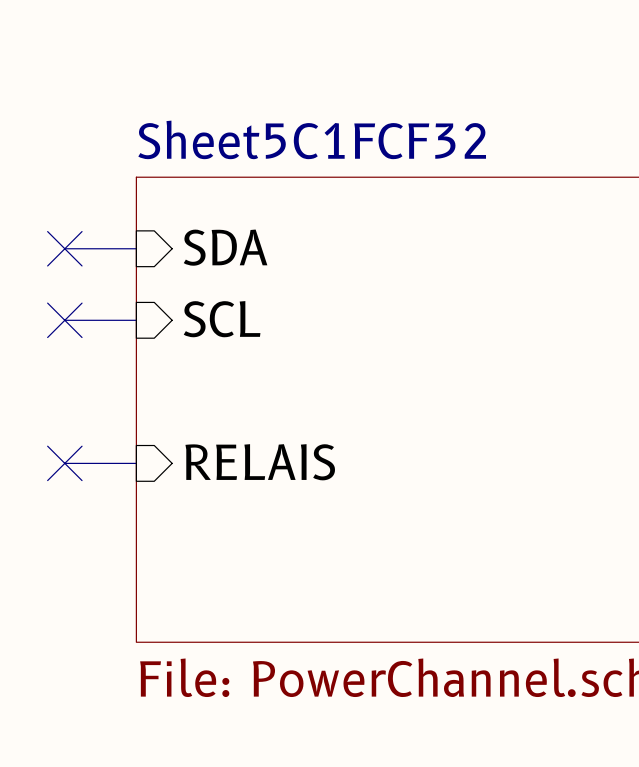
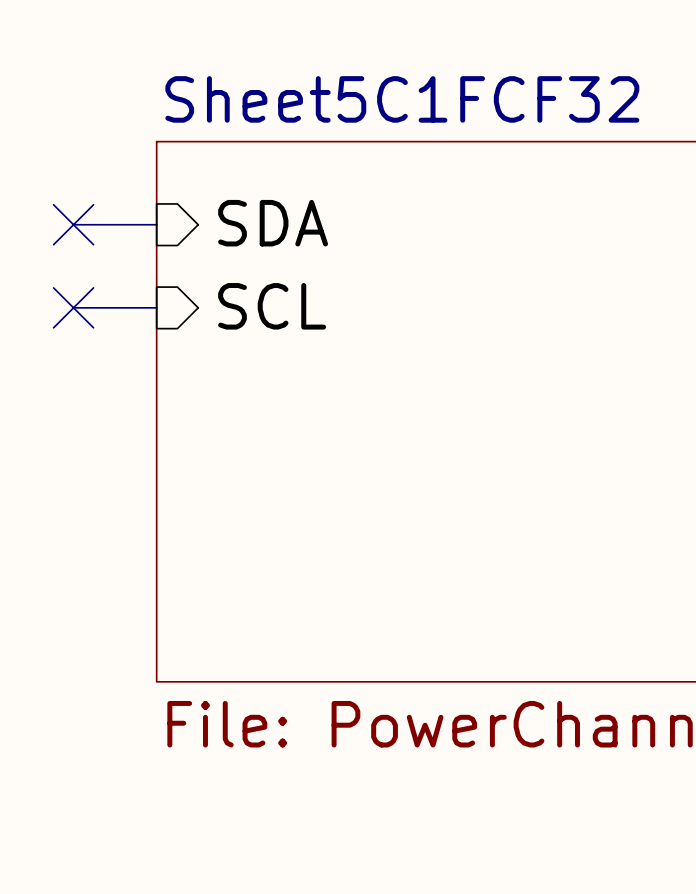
sheet pin: RELAIS (260, 462) -> none
wire: (64, 463) (136, 463) -> none
no-connect mark: (64, 463) -> none

